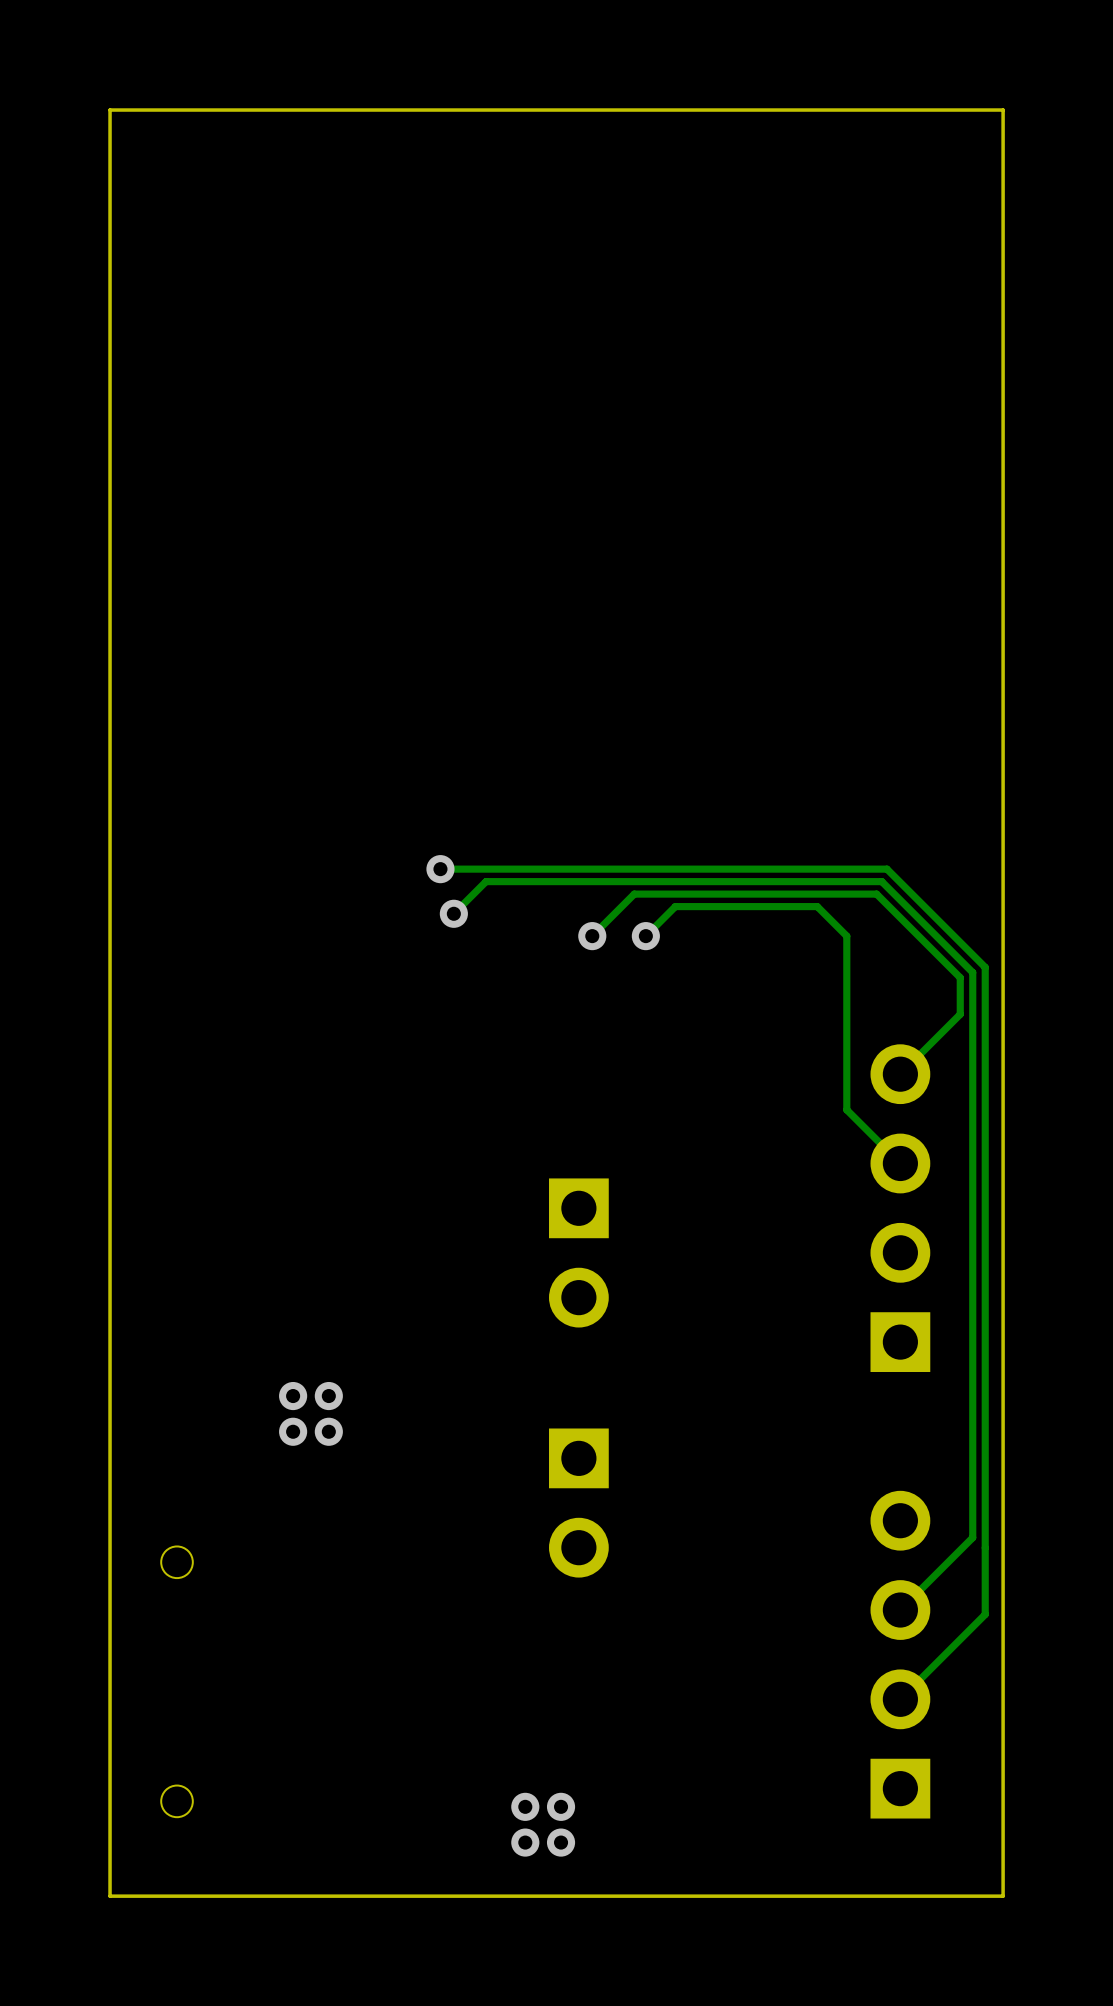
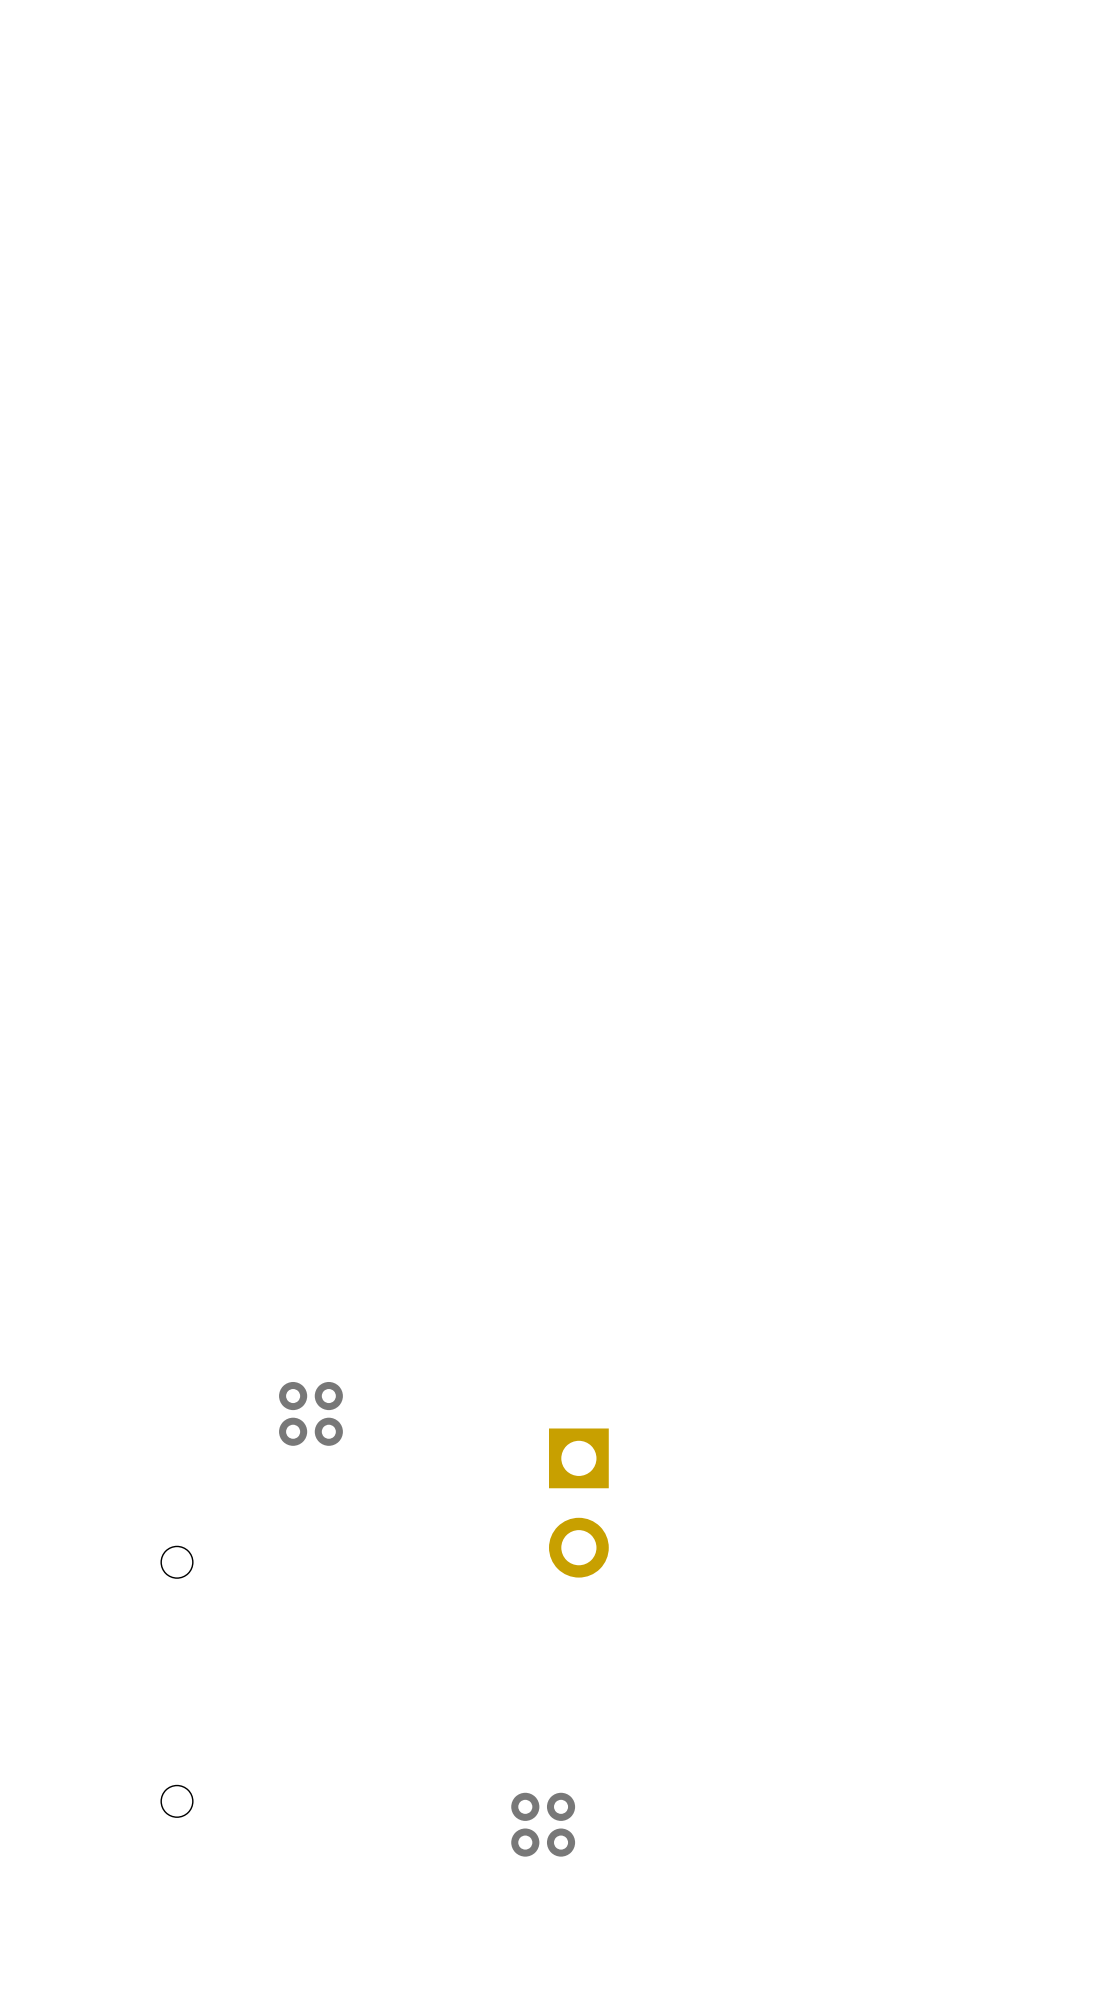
board edge: (1003, 110) (110, 110) (110, 1896) (1003, 1896) (1003, 110) -> none
track: (440, 869) (886, 869) (985, 967) (985, 1614) (900, 1699) -> none
via: (440, 869) -> none
track: (453, 913) (486, 881) (881, 881) (972, 972) (972, 1537) (900, 1610) -> none
via: (453, 913) -> none
track: (592, 936) (634, 894) (876, 894) (960, 977) (960, 1014) (900, 1074) -> none
via: (592, 936) -> none
track: (645, 936) (675, 906) (817, 906) (846, 936) (846, 1109) (900, 1163) -> none
via: (645, 936) -> none
part: (900, 1208) -> none
part: (578, 1252) -> none
part: (900, 1654) -> none

